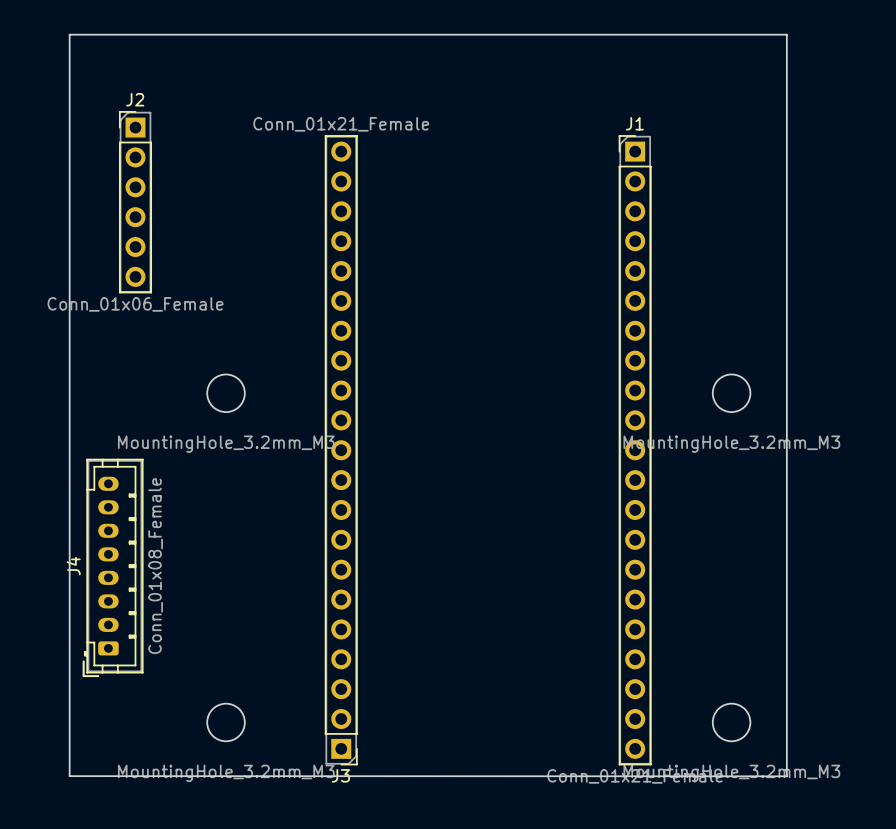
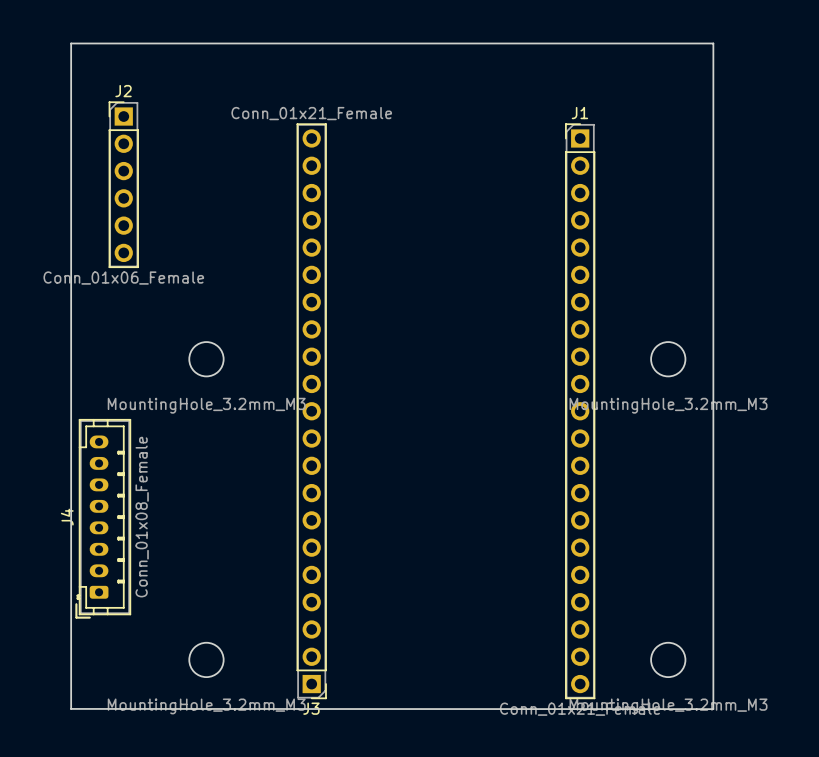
board edge: (77, 776) (69, 776) (69, 34) (786, 34) (786, 776) (780, 776) -> (71, 708) (71, 43) (713, 43) (713, 709)

